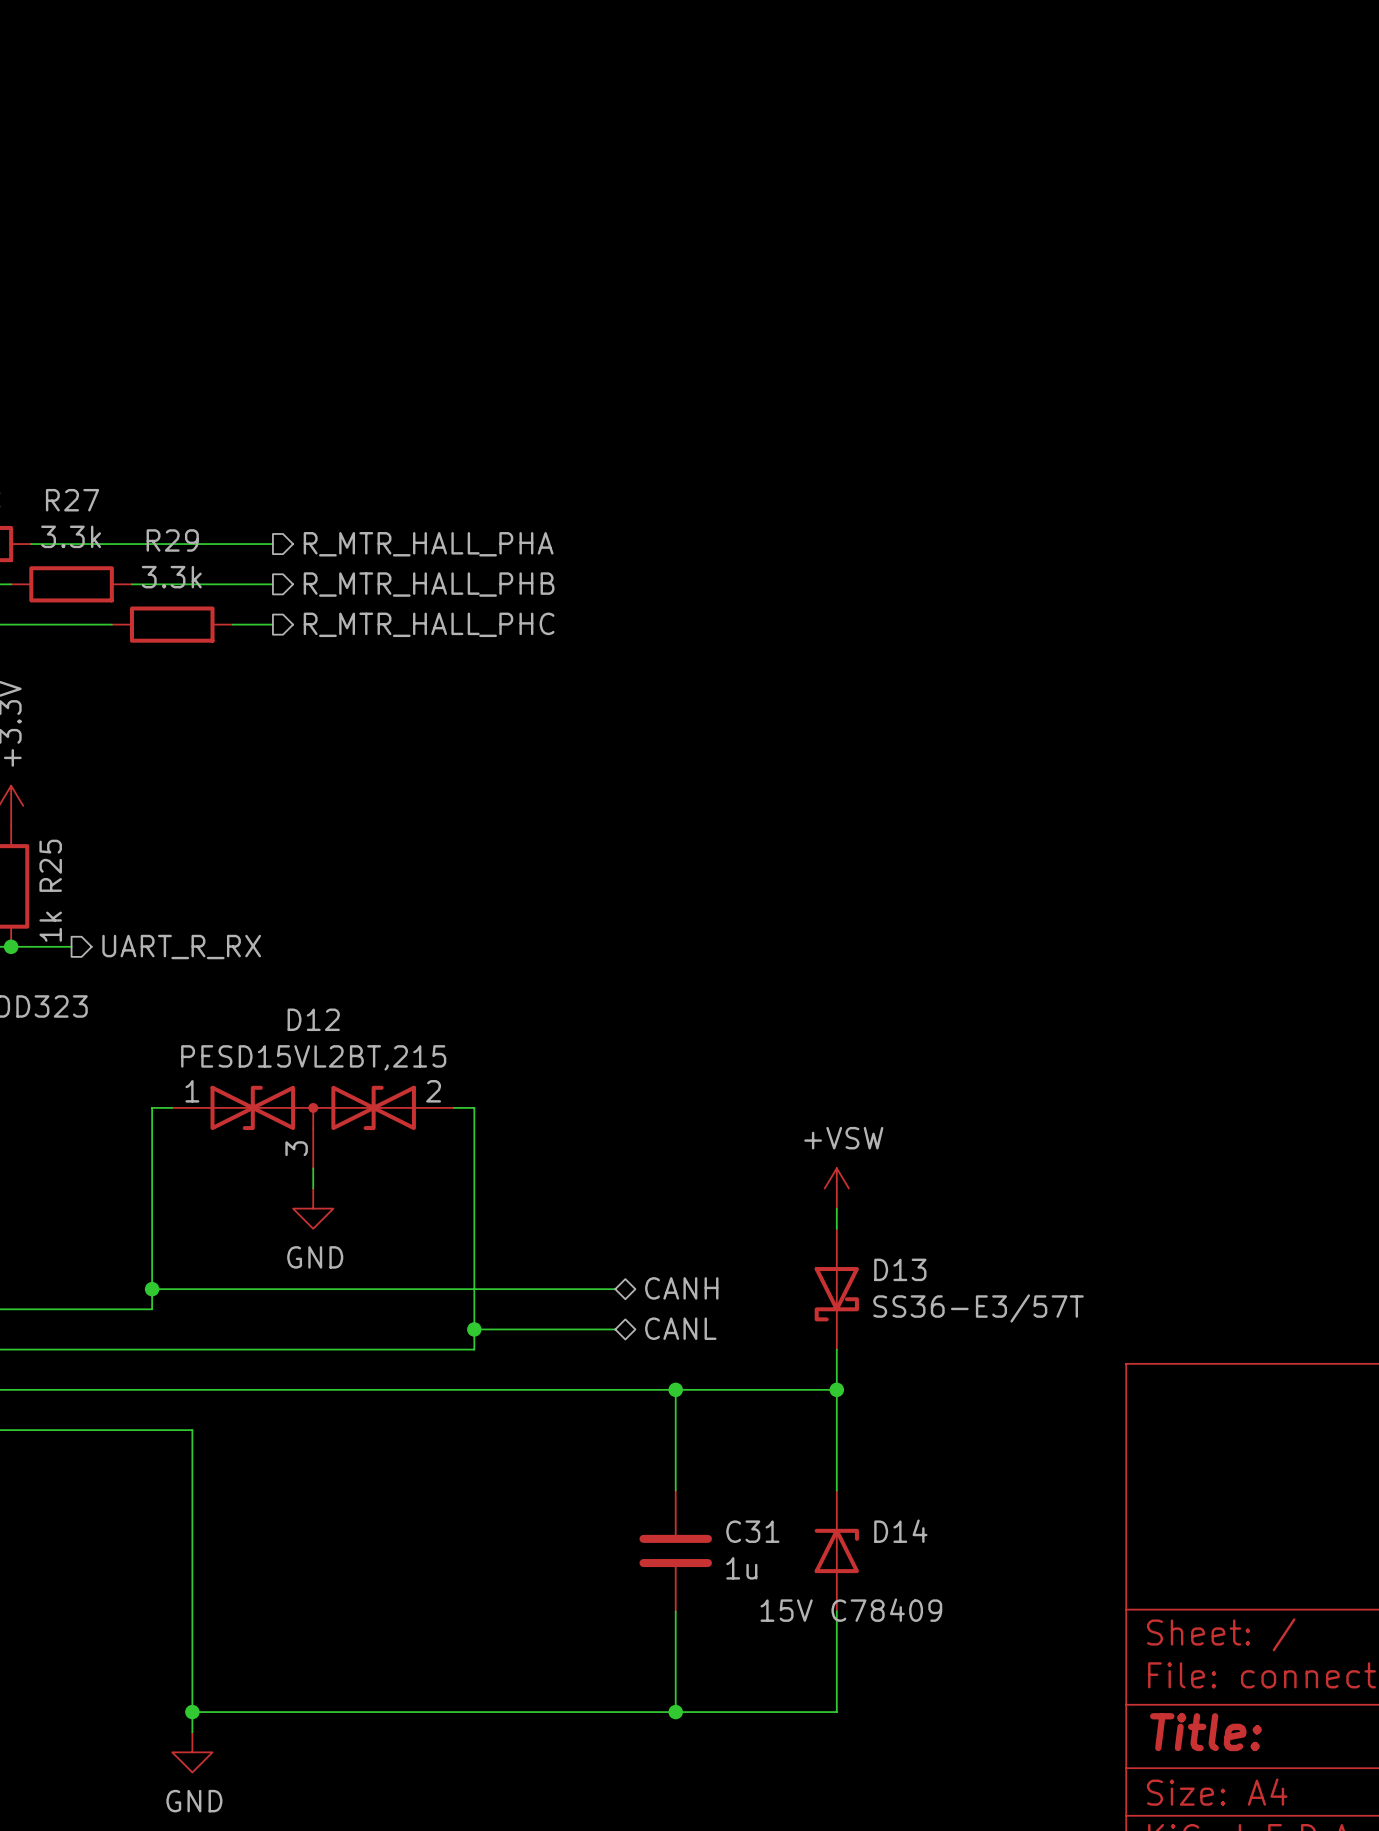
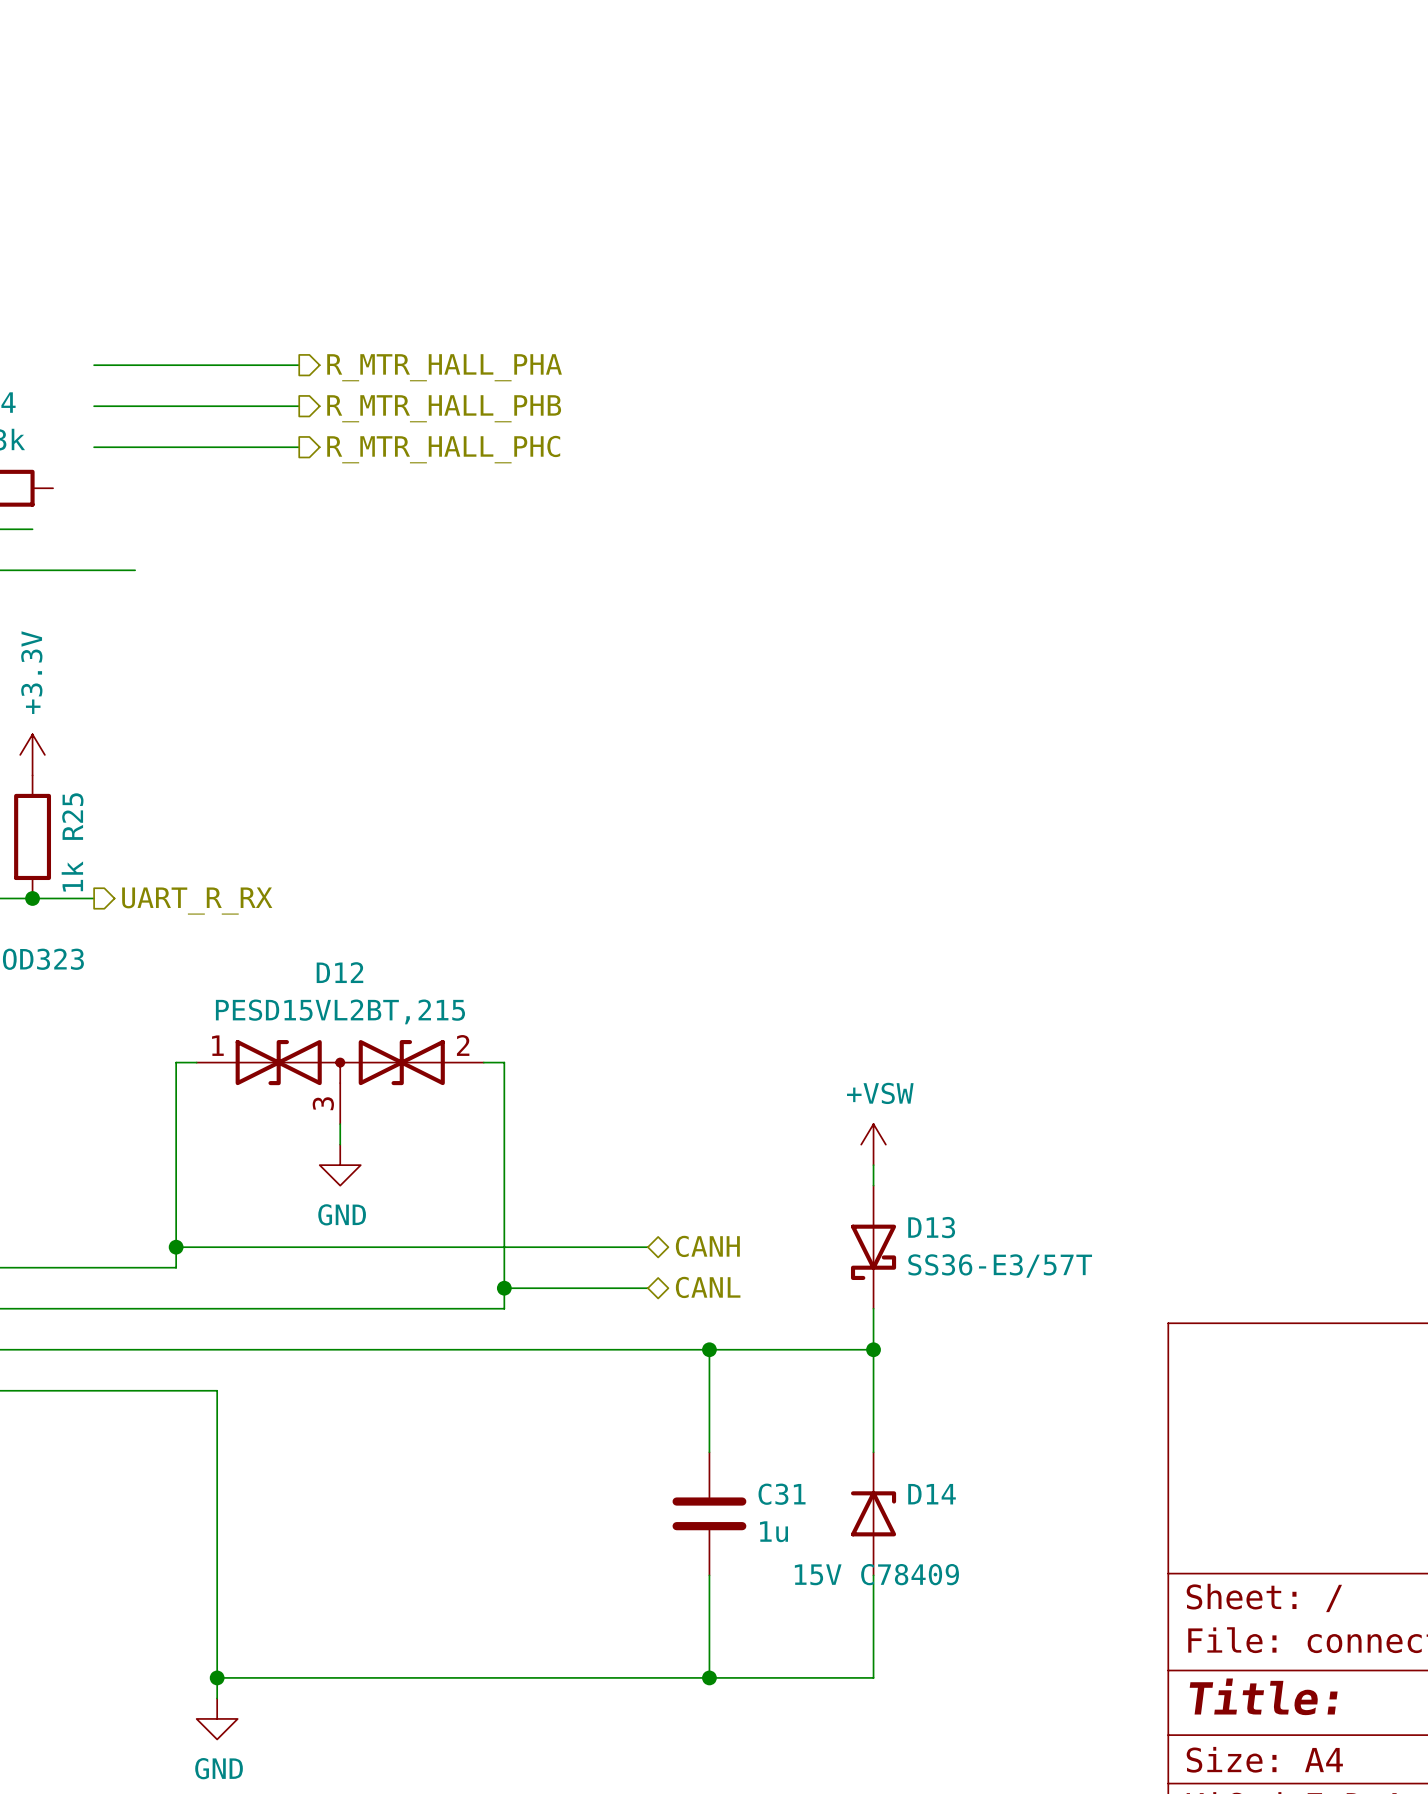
wire: none -> (94, 365) (299, 365)
wire: none -> (94, 406) (299, 406)
wire: none -> (94, 447) (299, 447)
wire: (31, 544) (272, 544) -> none
hierarchical label position: R_MTR_HALL_PHA (428, 544) -> R_MTR_HALL_PHA (444, 367)
R27: 3.3k (71, 584) -> none
wire: (131, 584) (272, 584) -> none
hierarchical label position: R_MTR_HALL_PHB (429, 584) -> R_MTR_HALL_PHB (444, 408)
R29: 3.3k (172, 624) -> none
wire: (232, 624) (272, 624) -> none
hierarchical label position: R_MTR_HALL_PHC (429, 624) -> R_MTR_HALL_PHC (443, 449)

